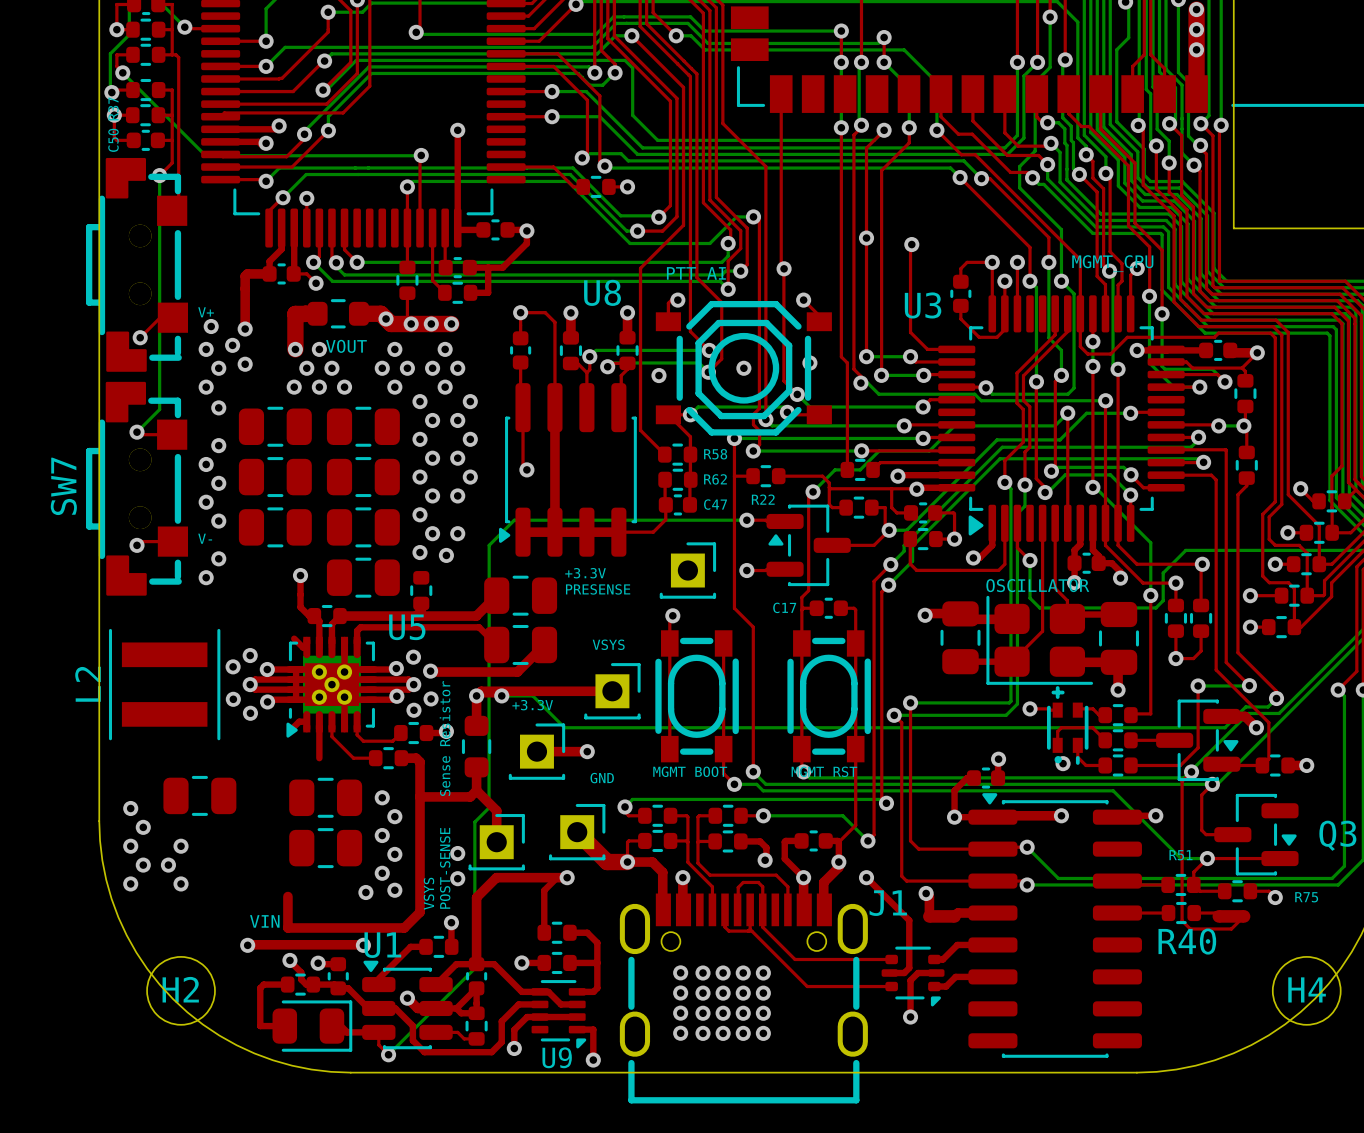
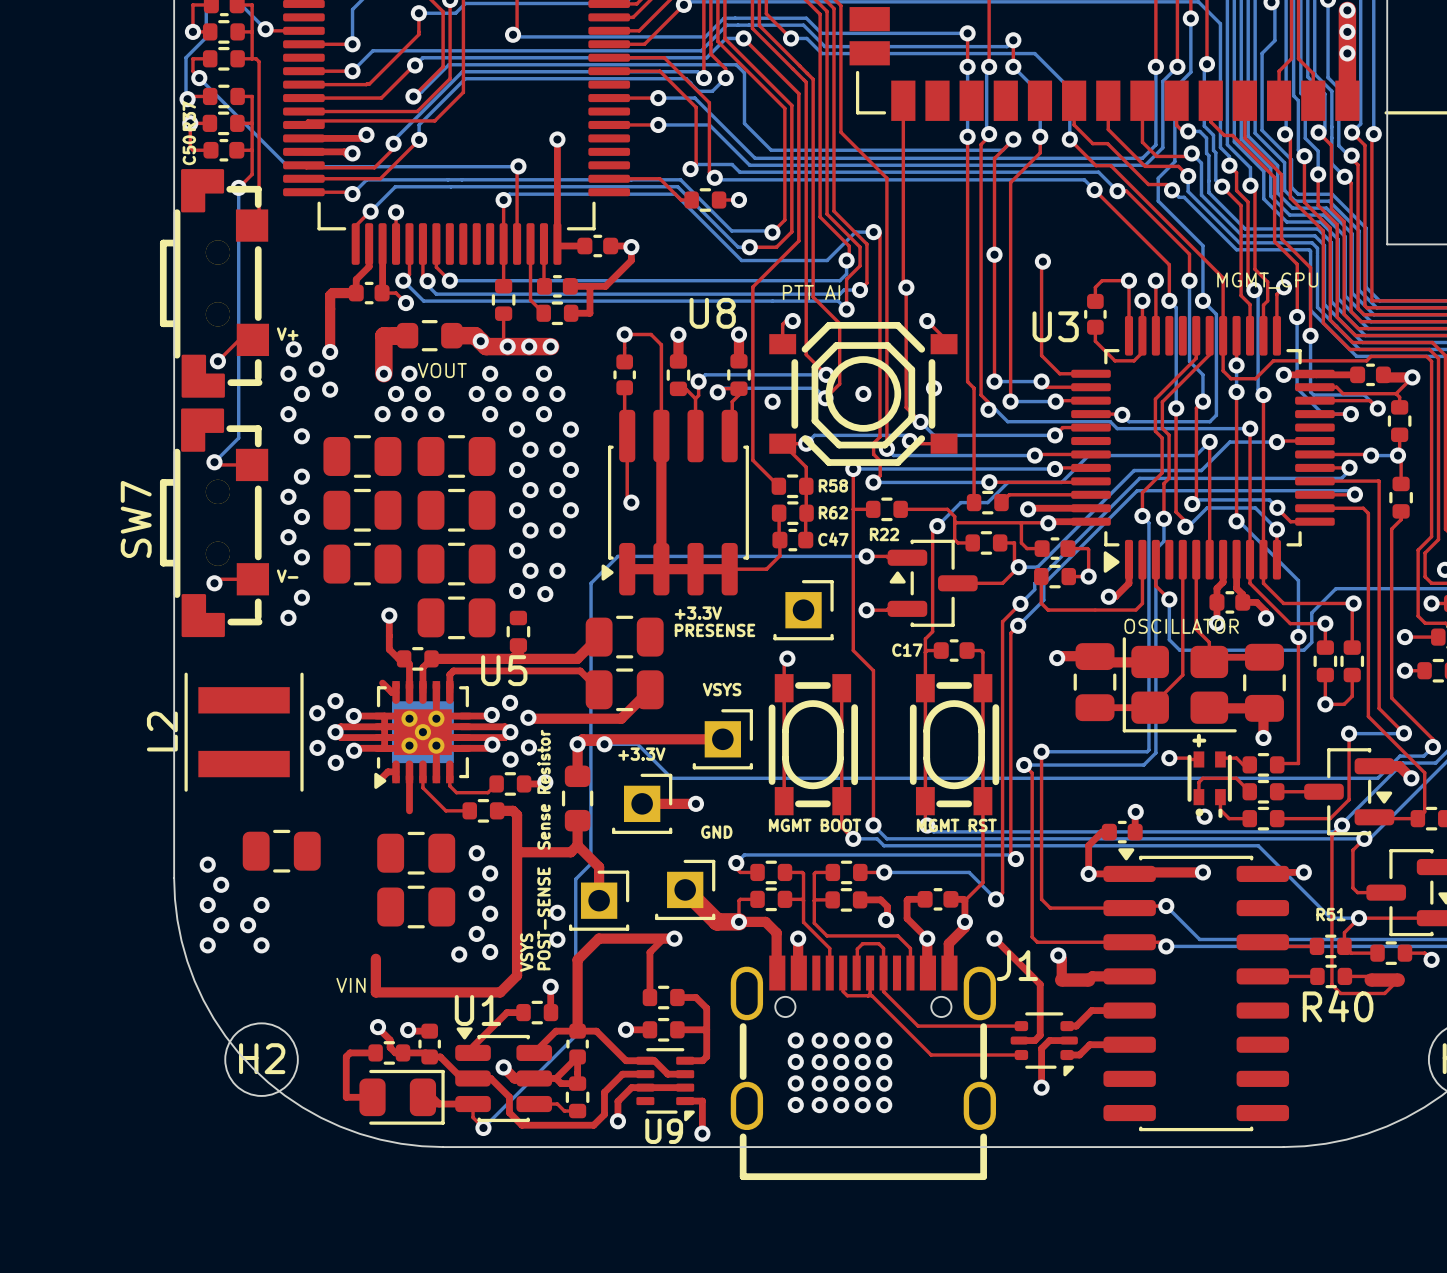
top track: (247, 945) (363, 945) -> none
via: (247, 945) -> none
via: (363, 945) -> none

